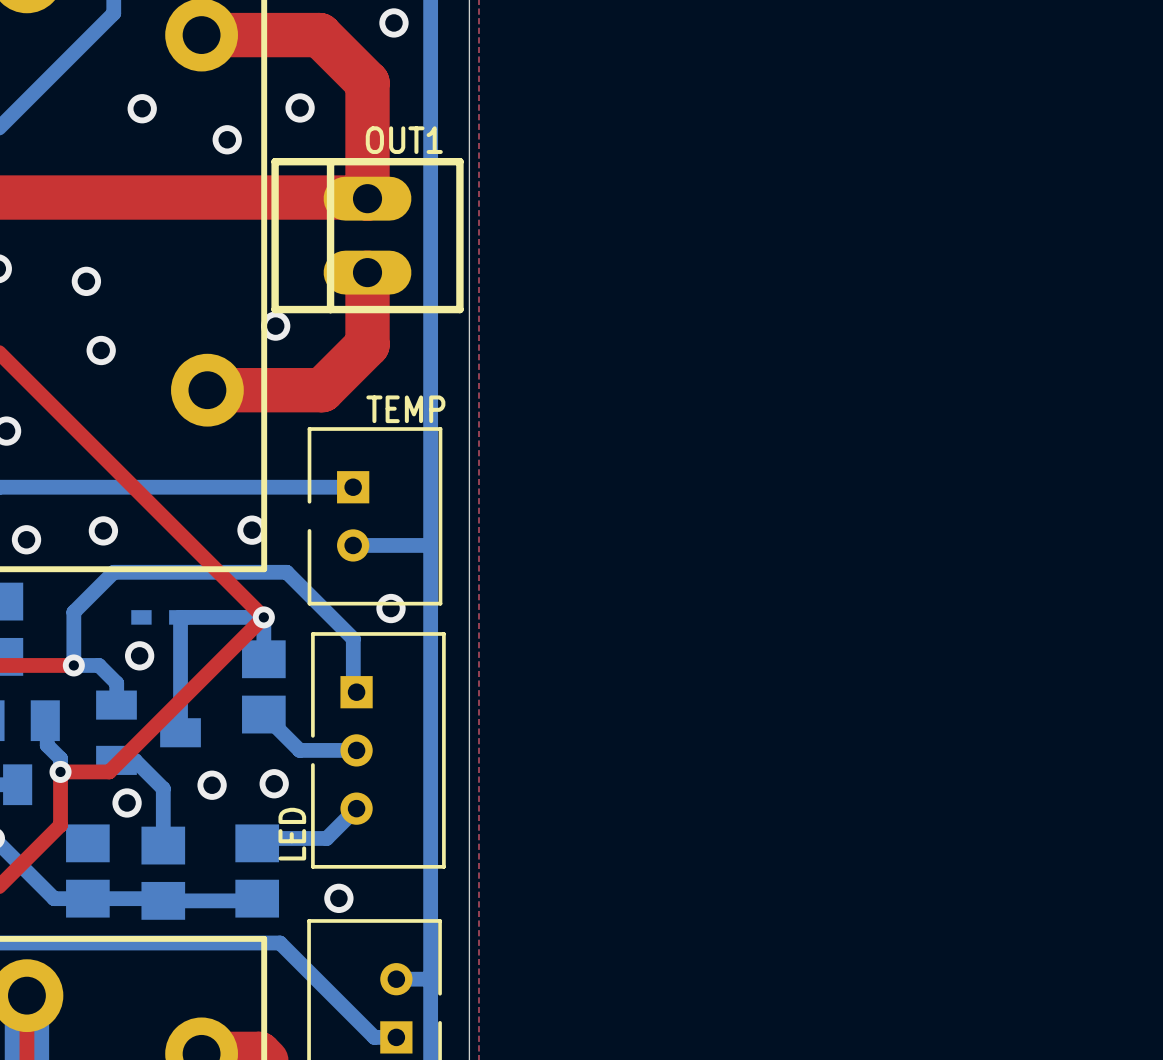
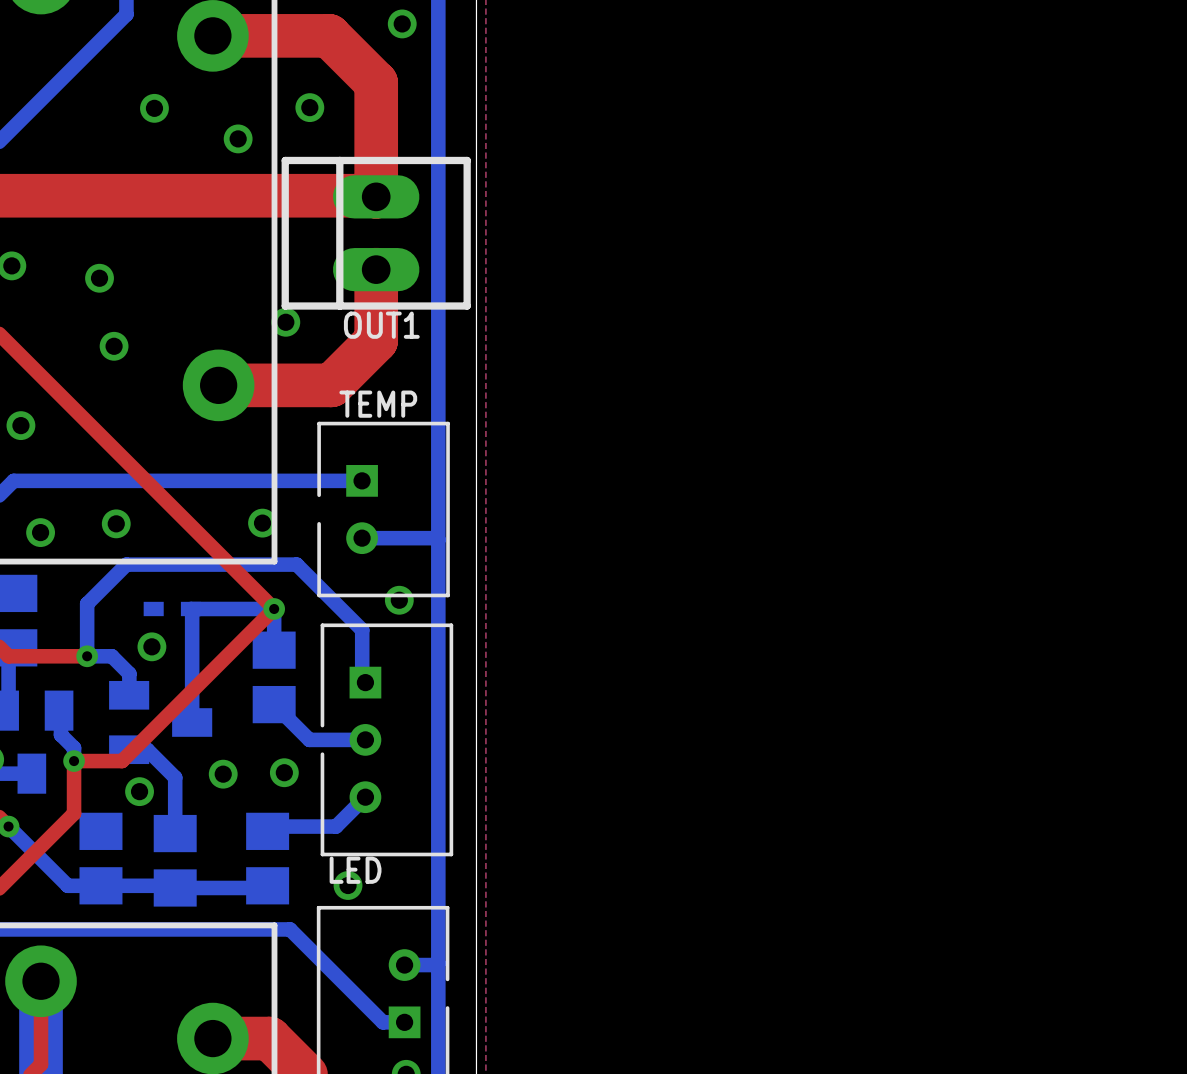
text position: OUT1 (404, 140) -> OUT1 (381, 325)
text position: TEMP (405, 409) -> TEMP (378, 404)
text rotation: 0° (292, 834) -> 90° clockwise (355, 870)
text position: LED (292, 834) -> LED (355, 870)

